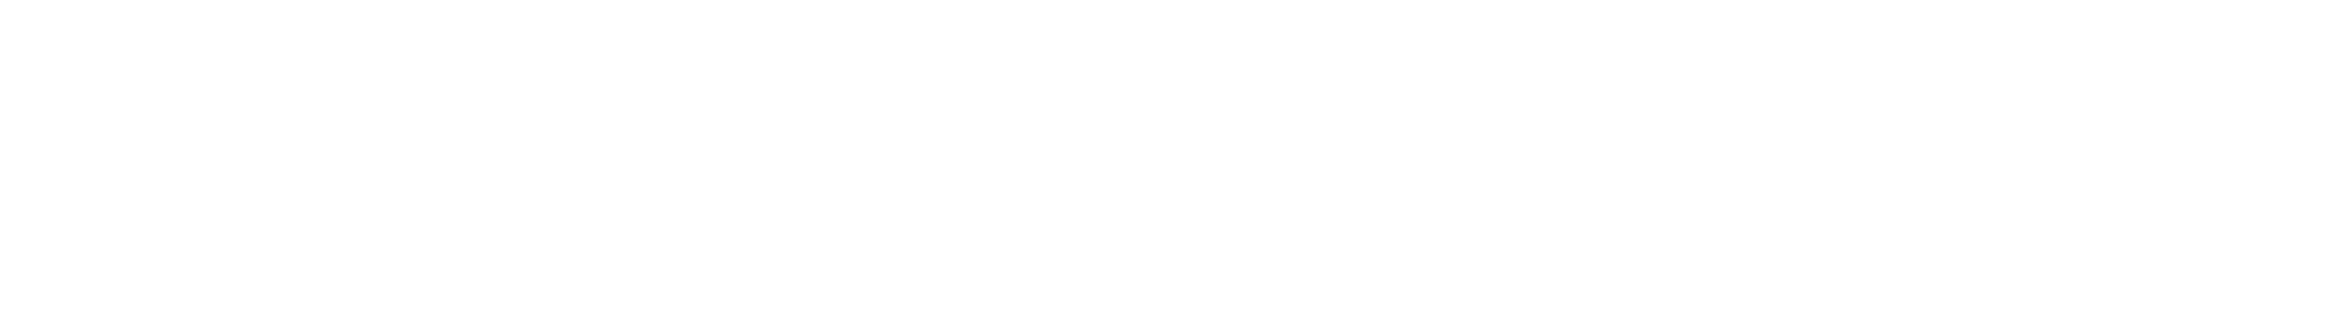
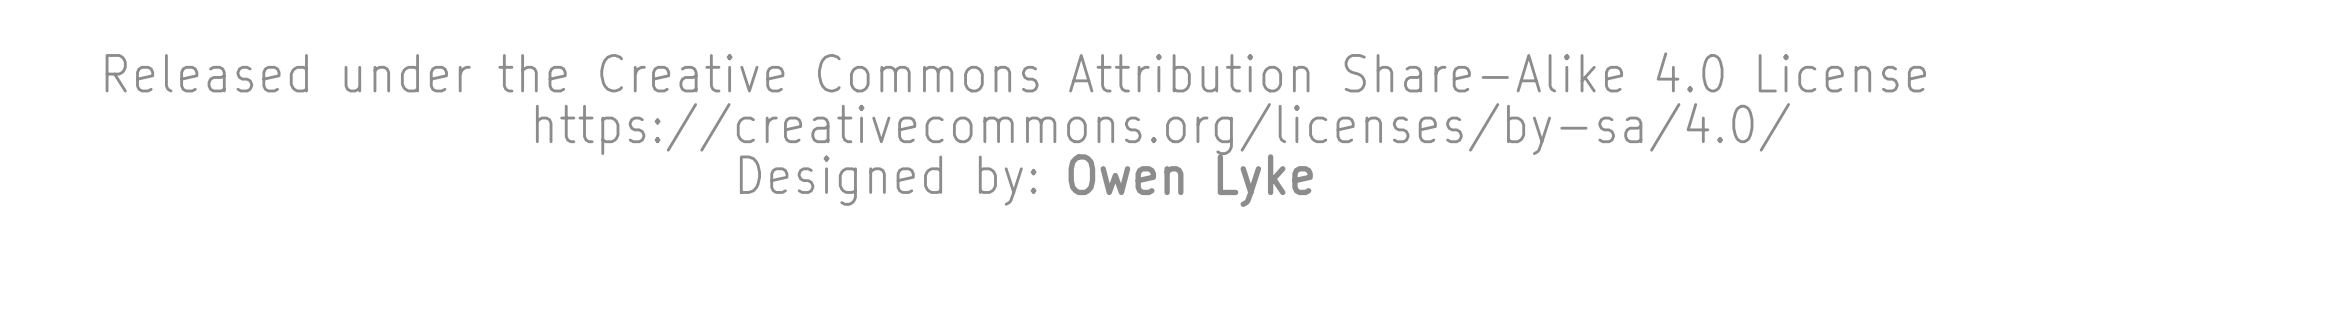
drawing: none -> [105, 52, 1926, 206]
text: none -> Owen Lyke (1190, 180)

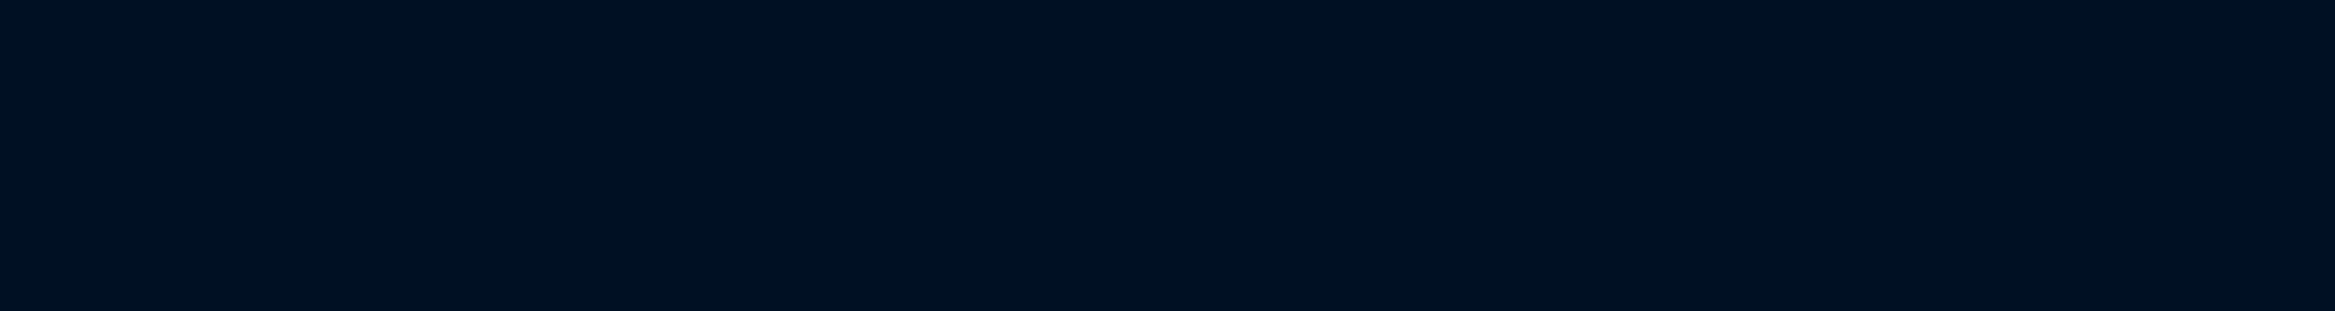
drawing: [105, 52, 1926, 206] -> none
text: Owen Lyke (1190, 180) -> none

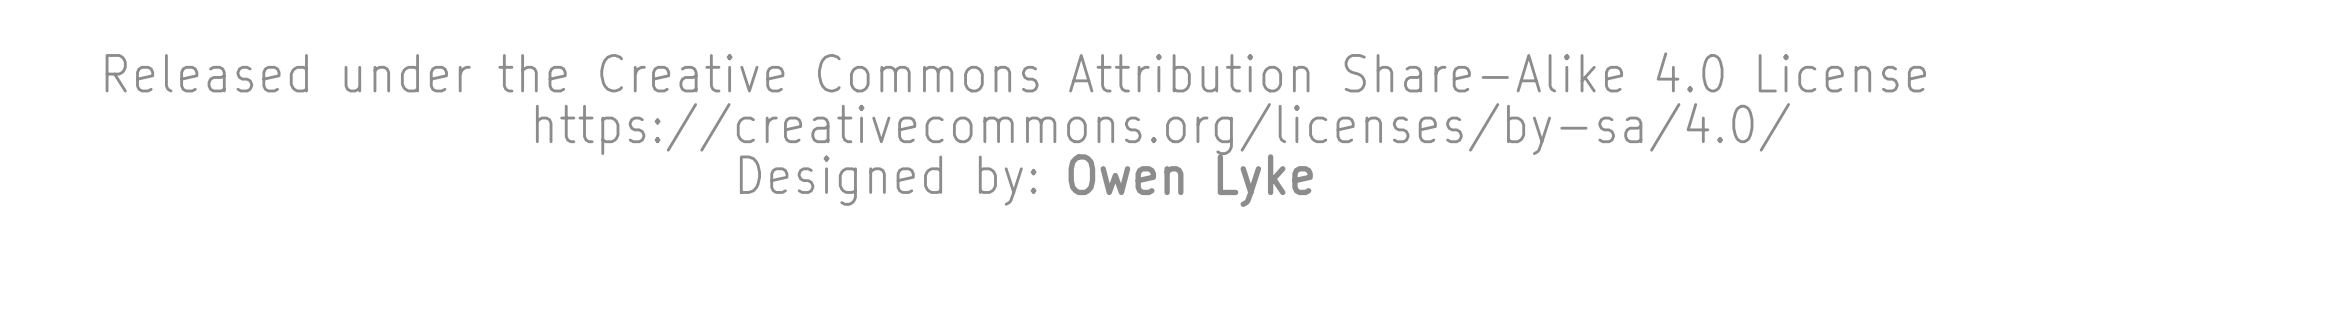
drawing: none -> [105, 52, 1926, 206]
text: none -> Owen Lyke (1190, 180)

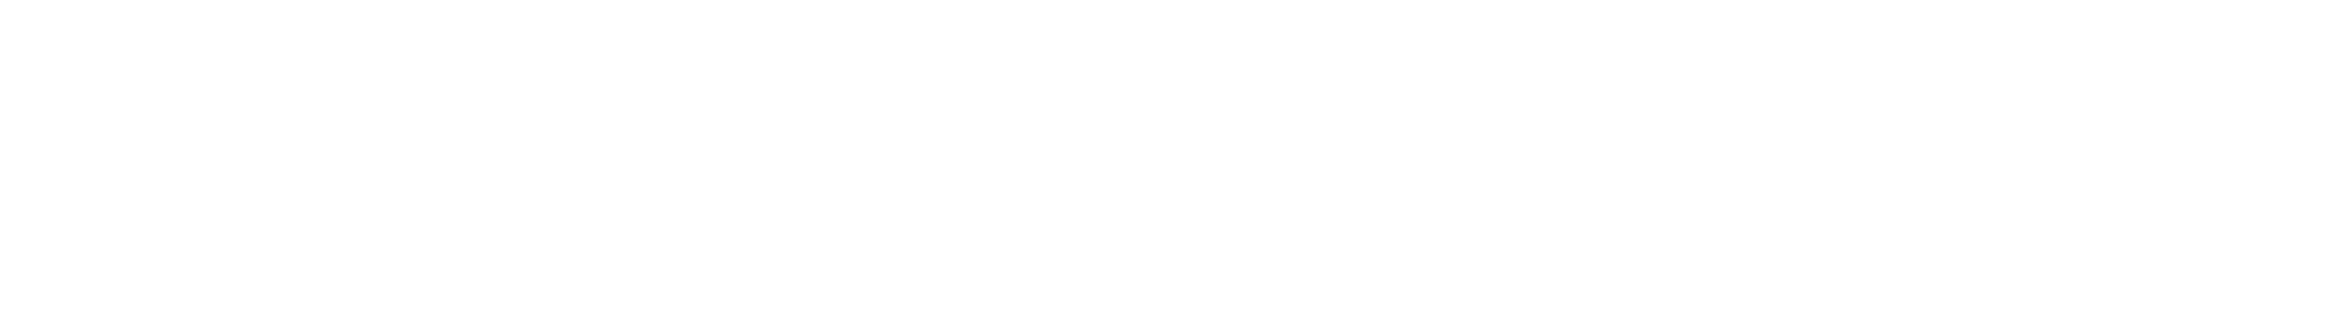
drawing: [105, 52, 1926, 206] -> none
text: Owen Lyke (1190, 180) -> none

